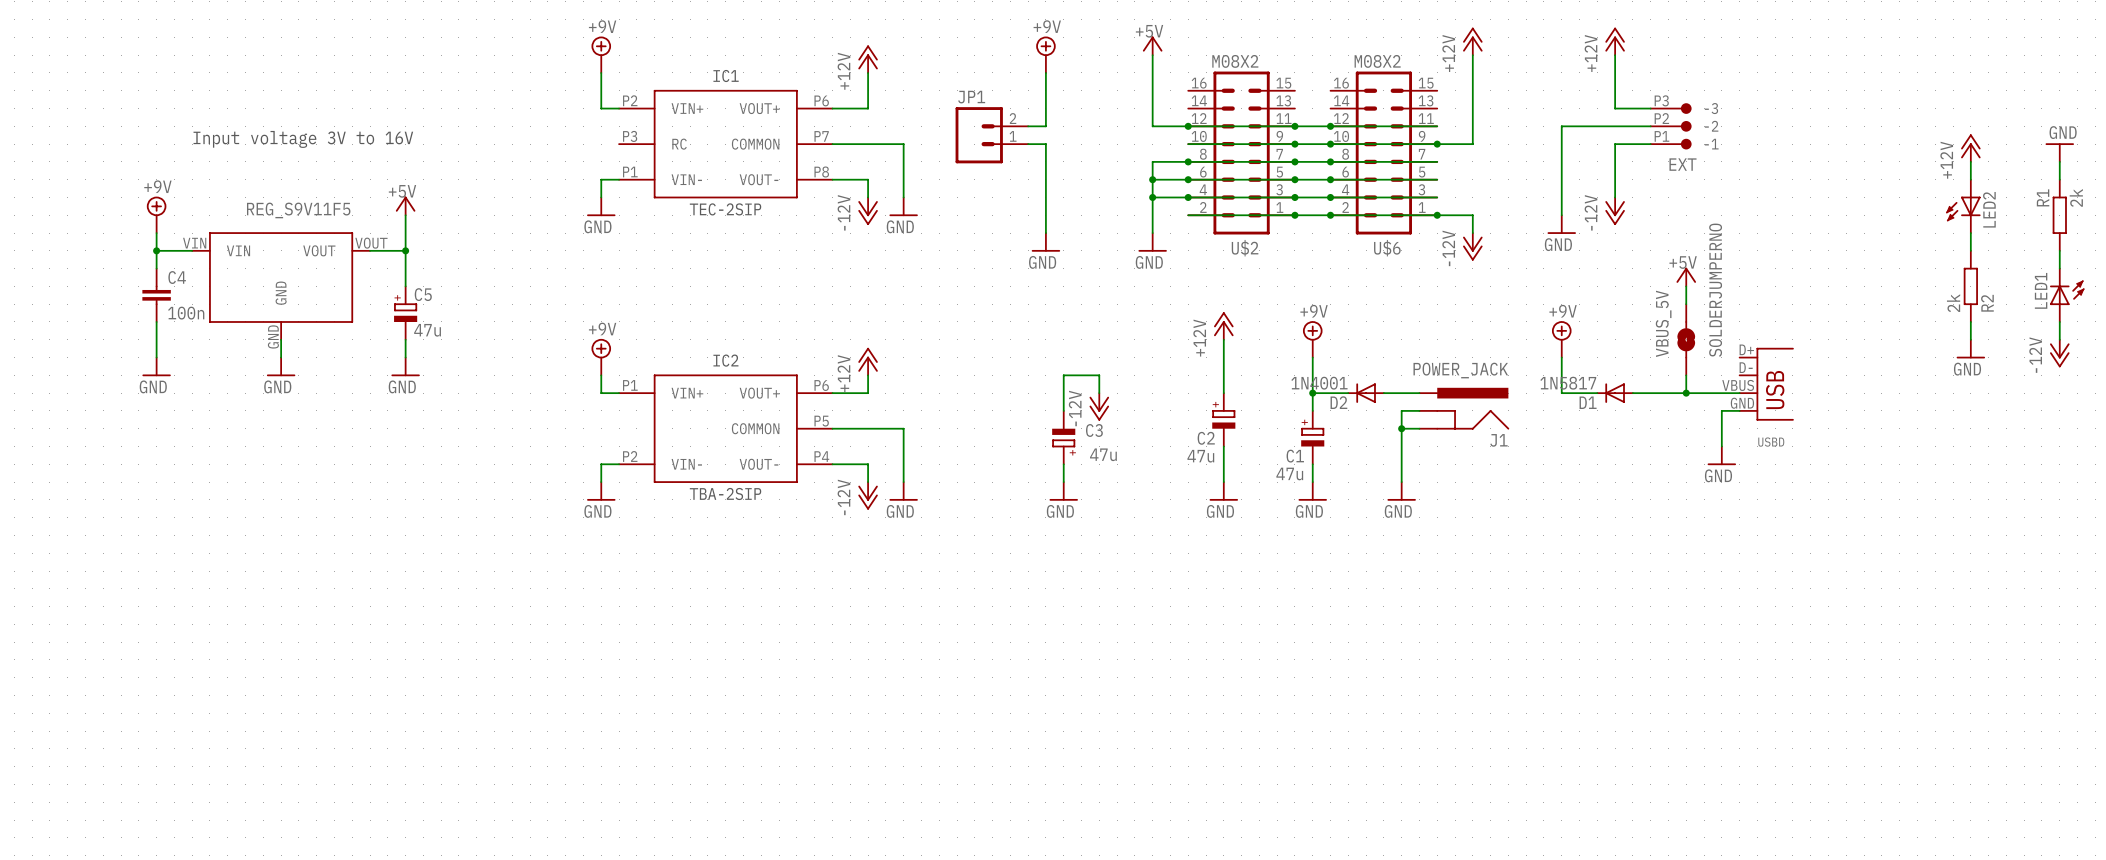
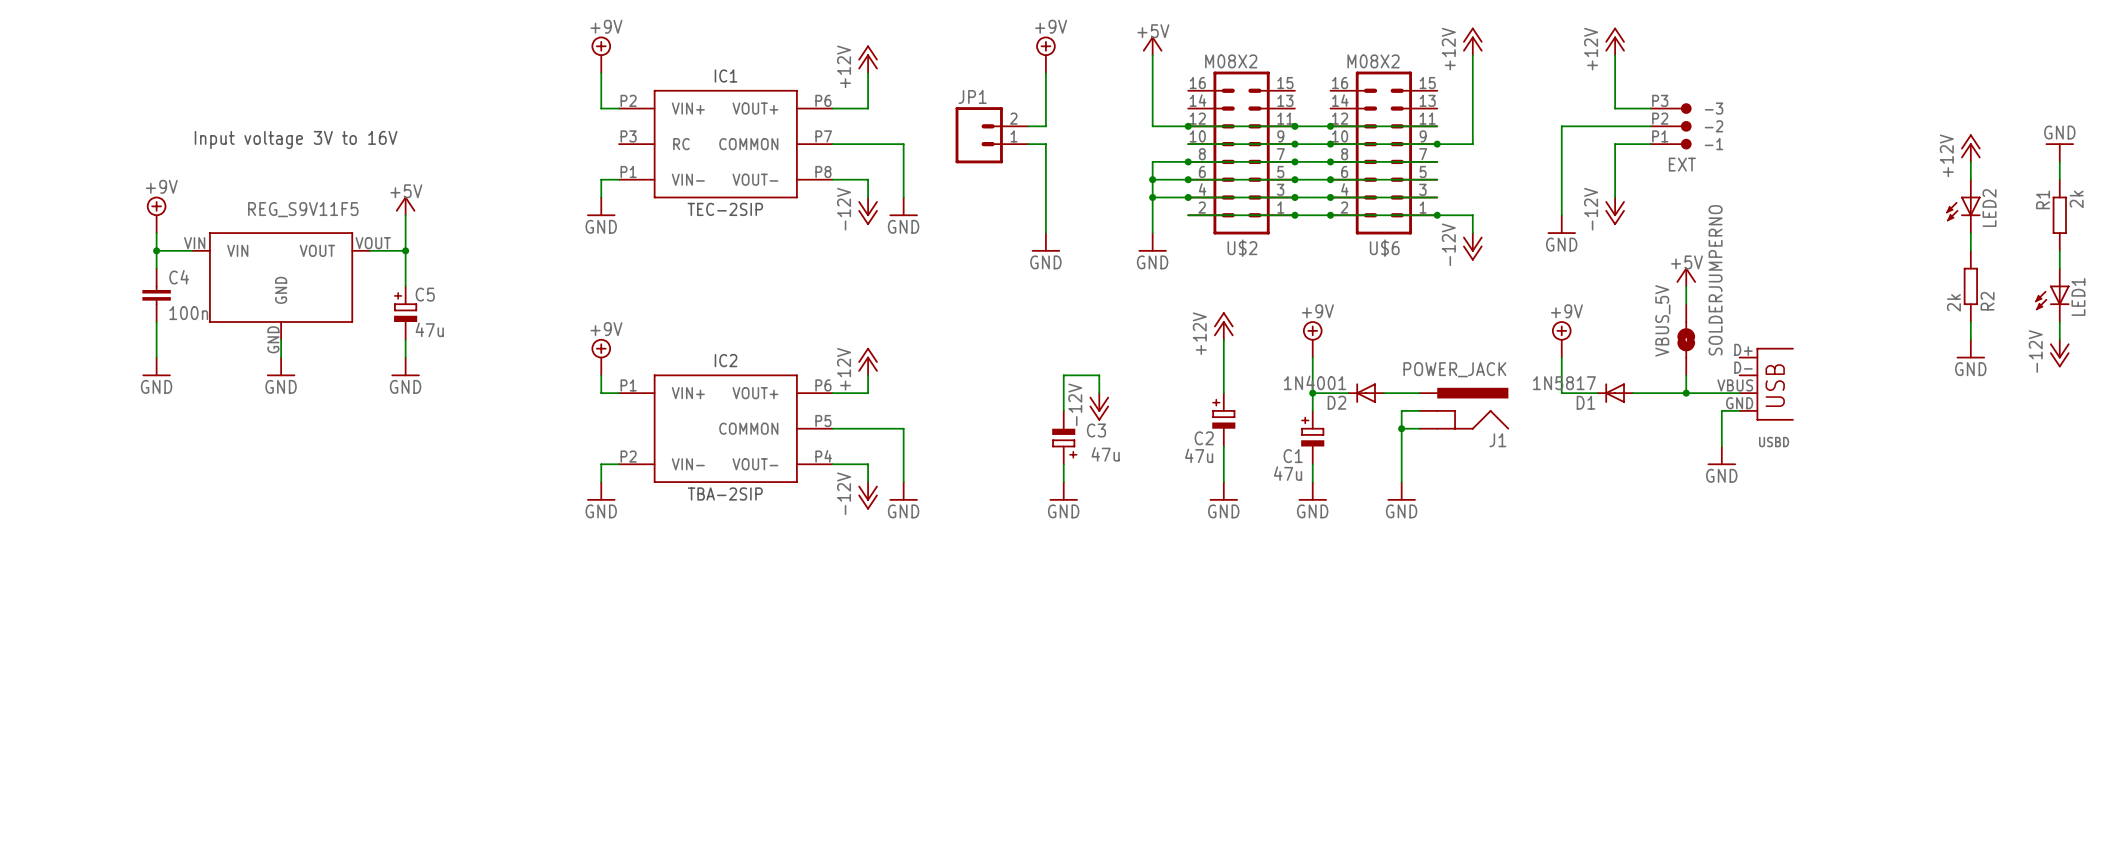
LED1 rotation: 0° (2067, 292) -> 180° (2052, 297)

